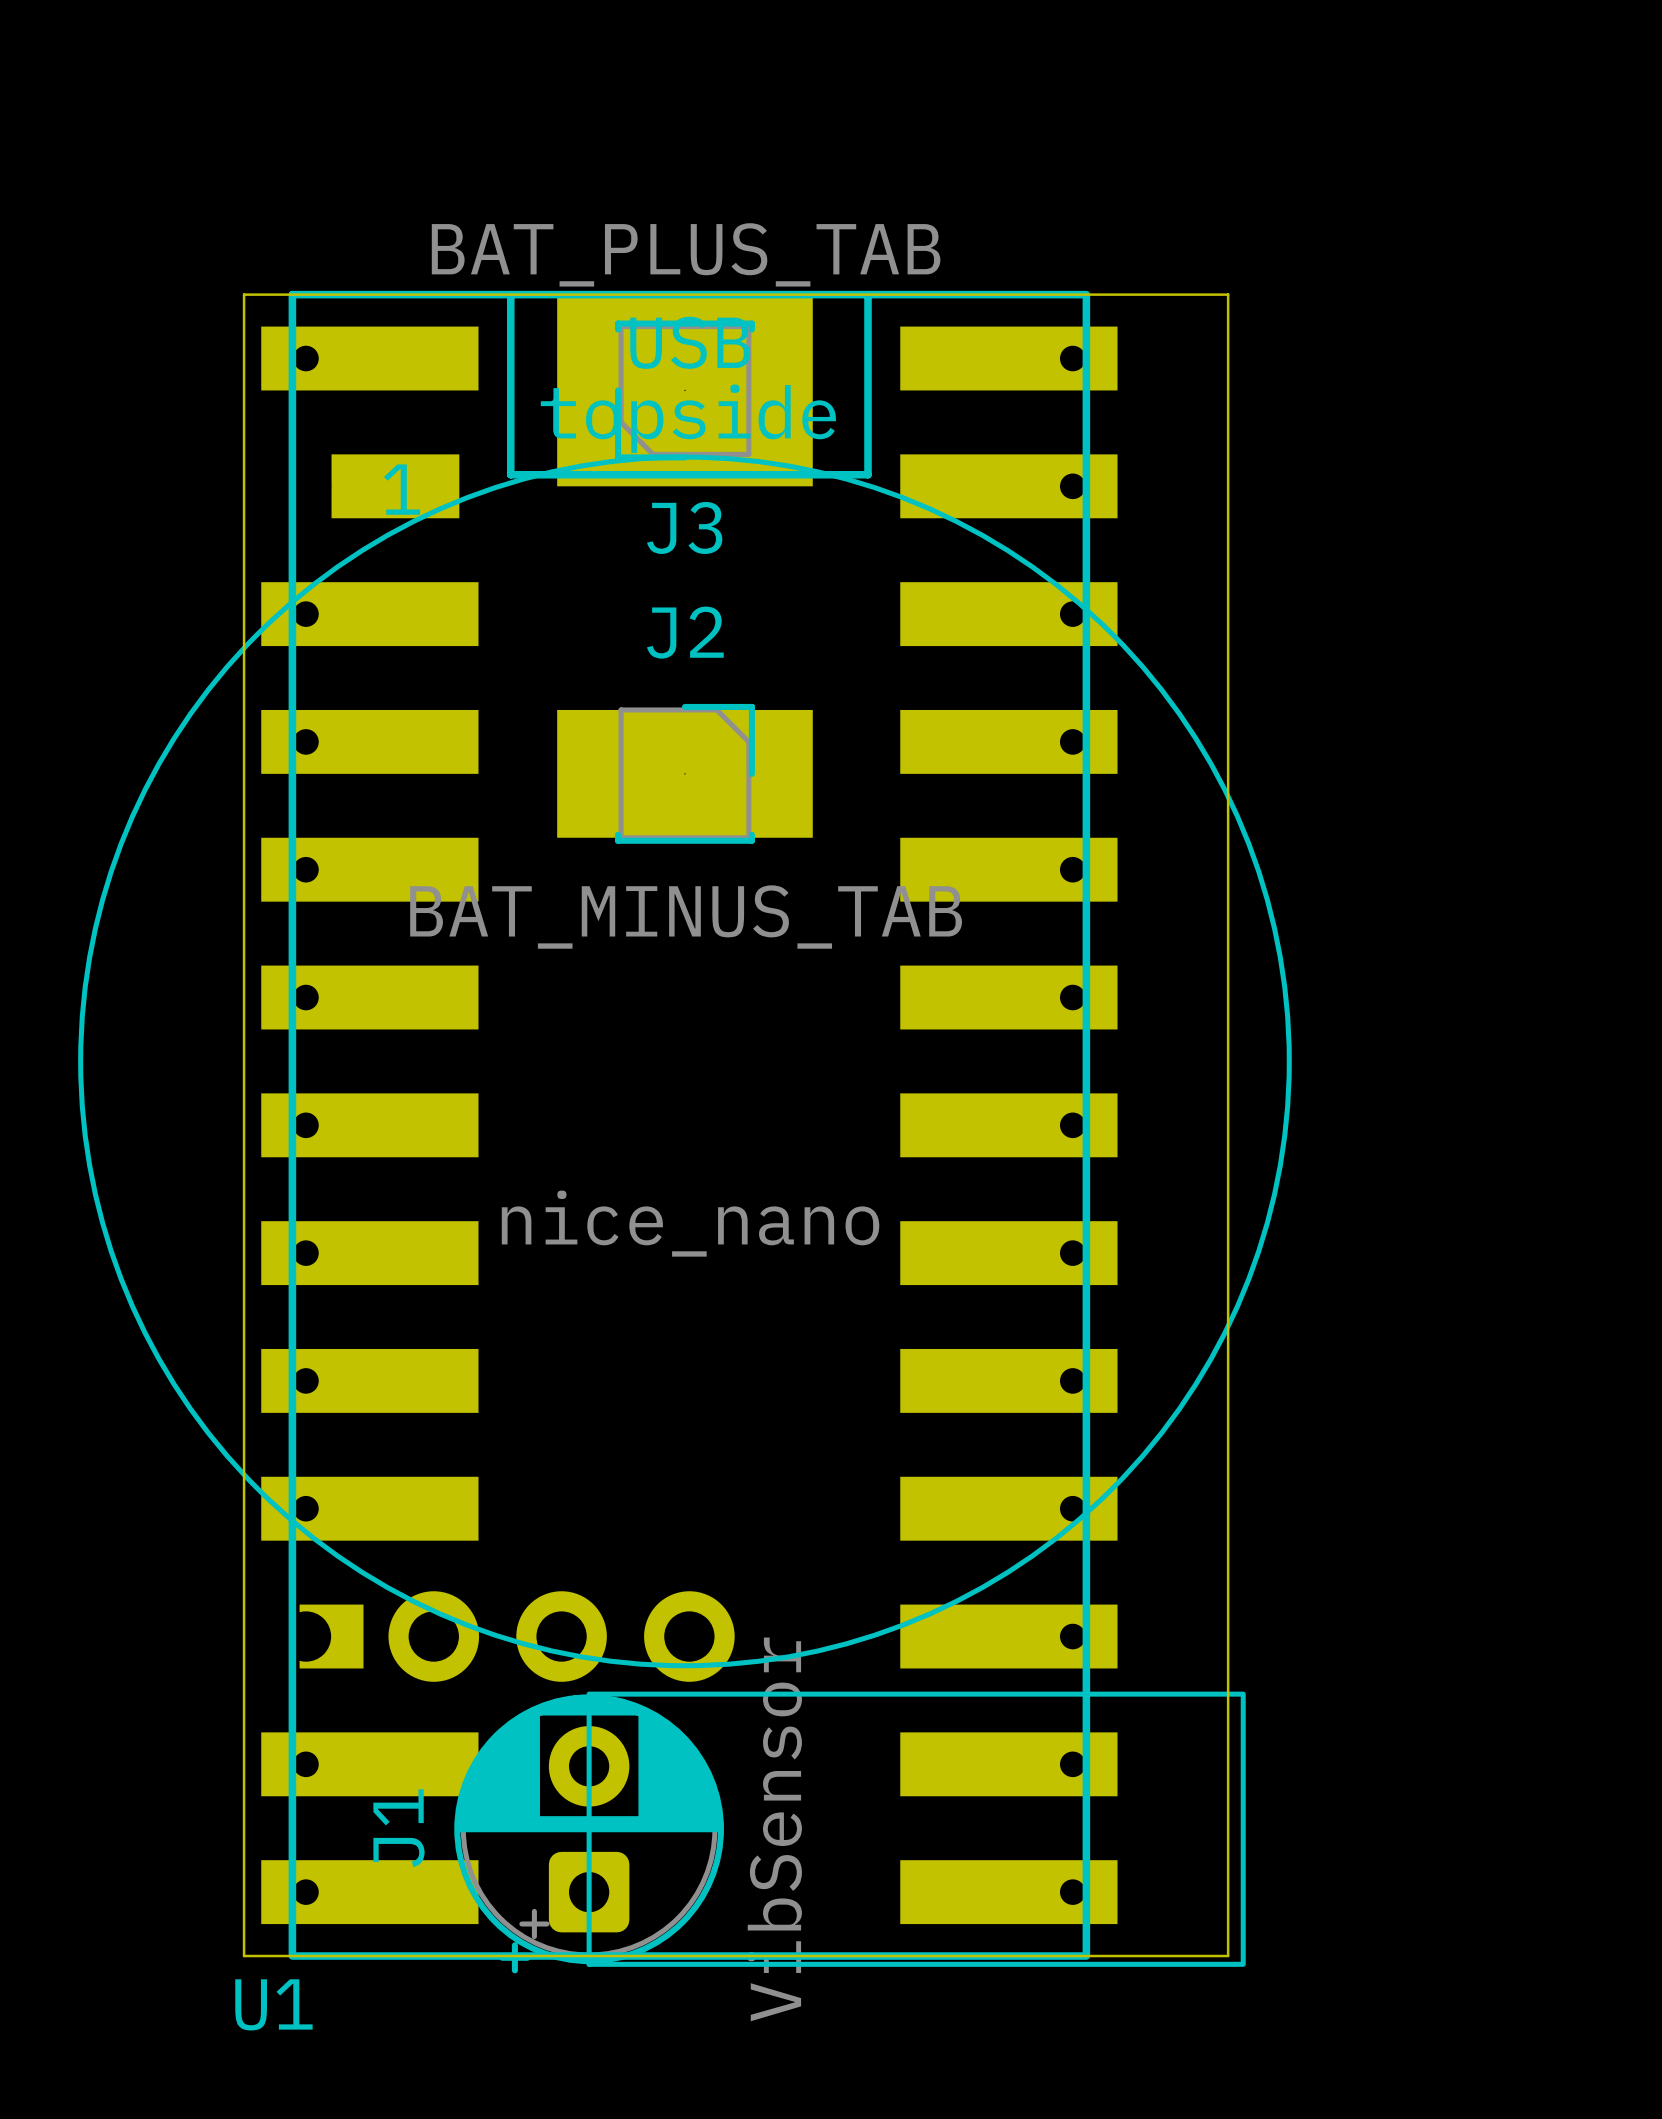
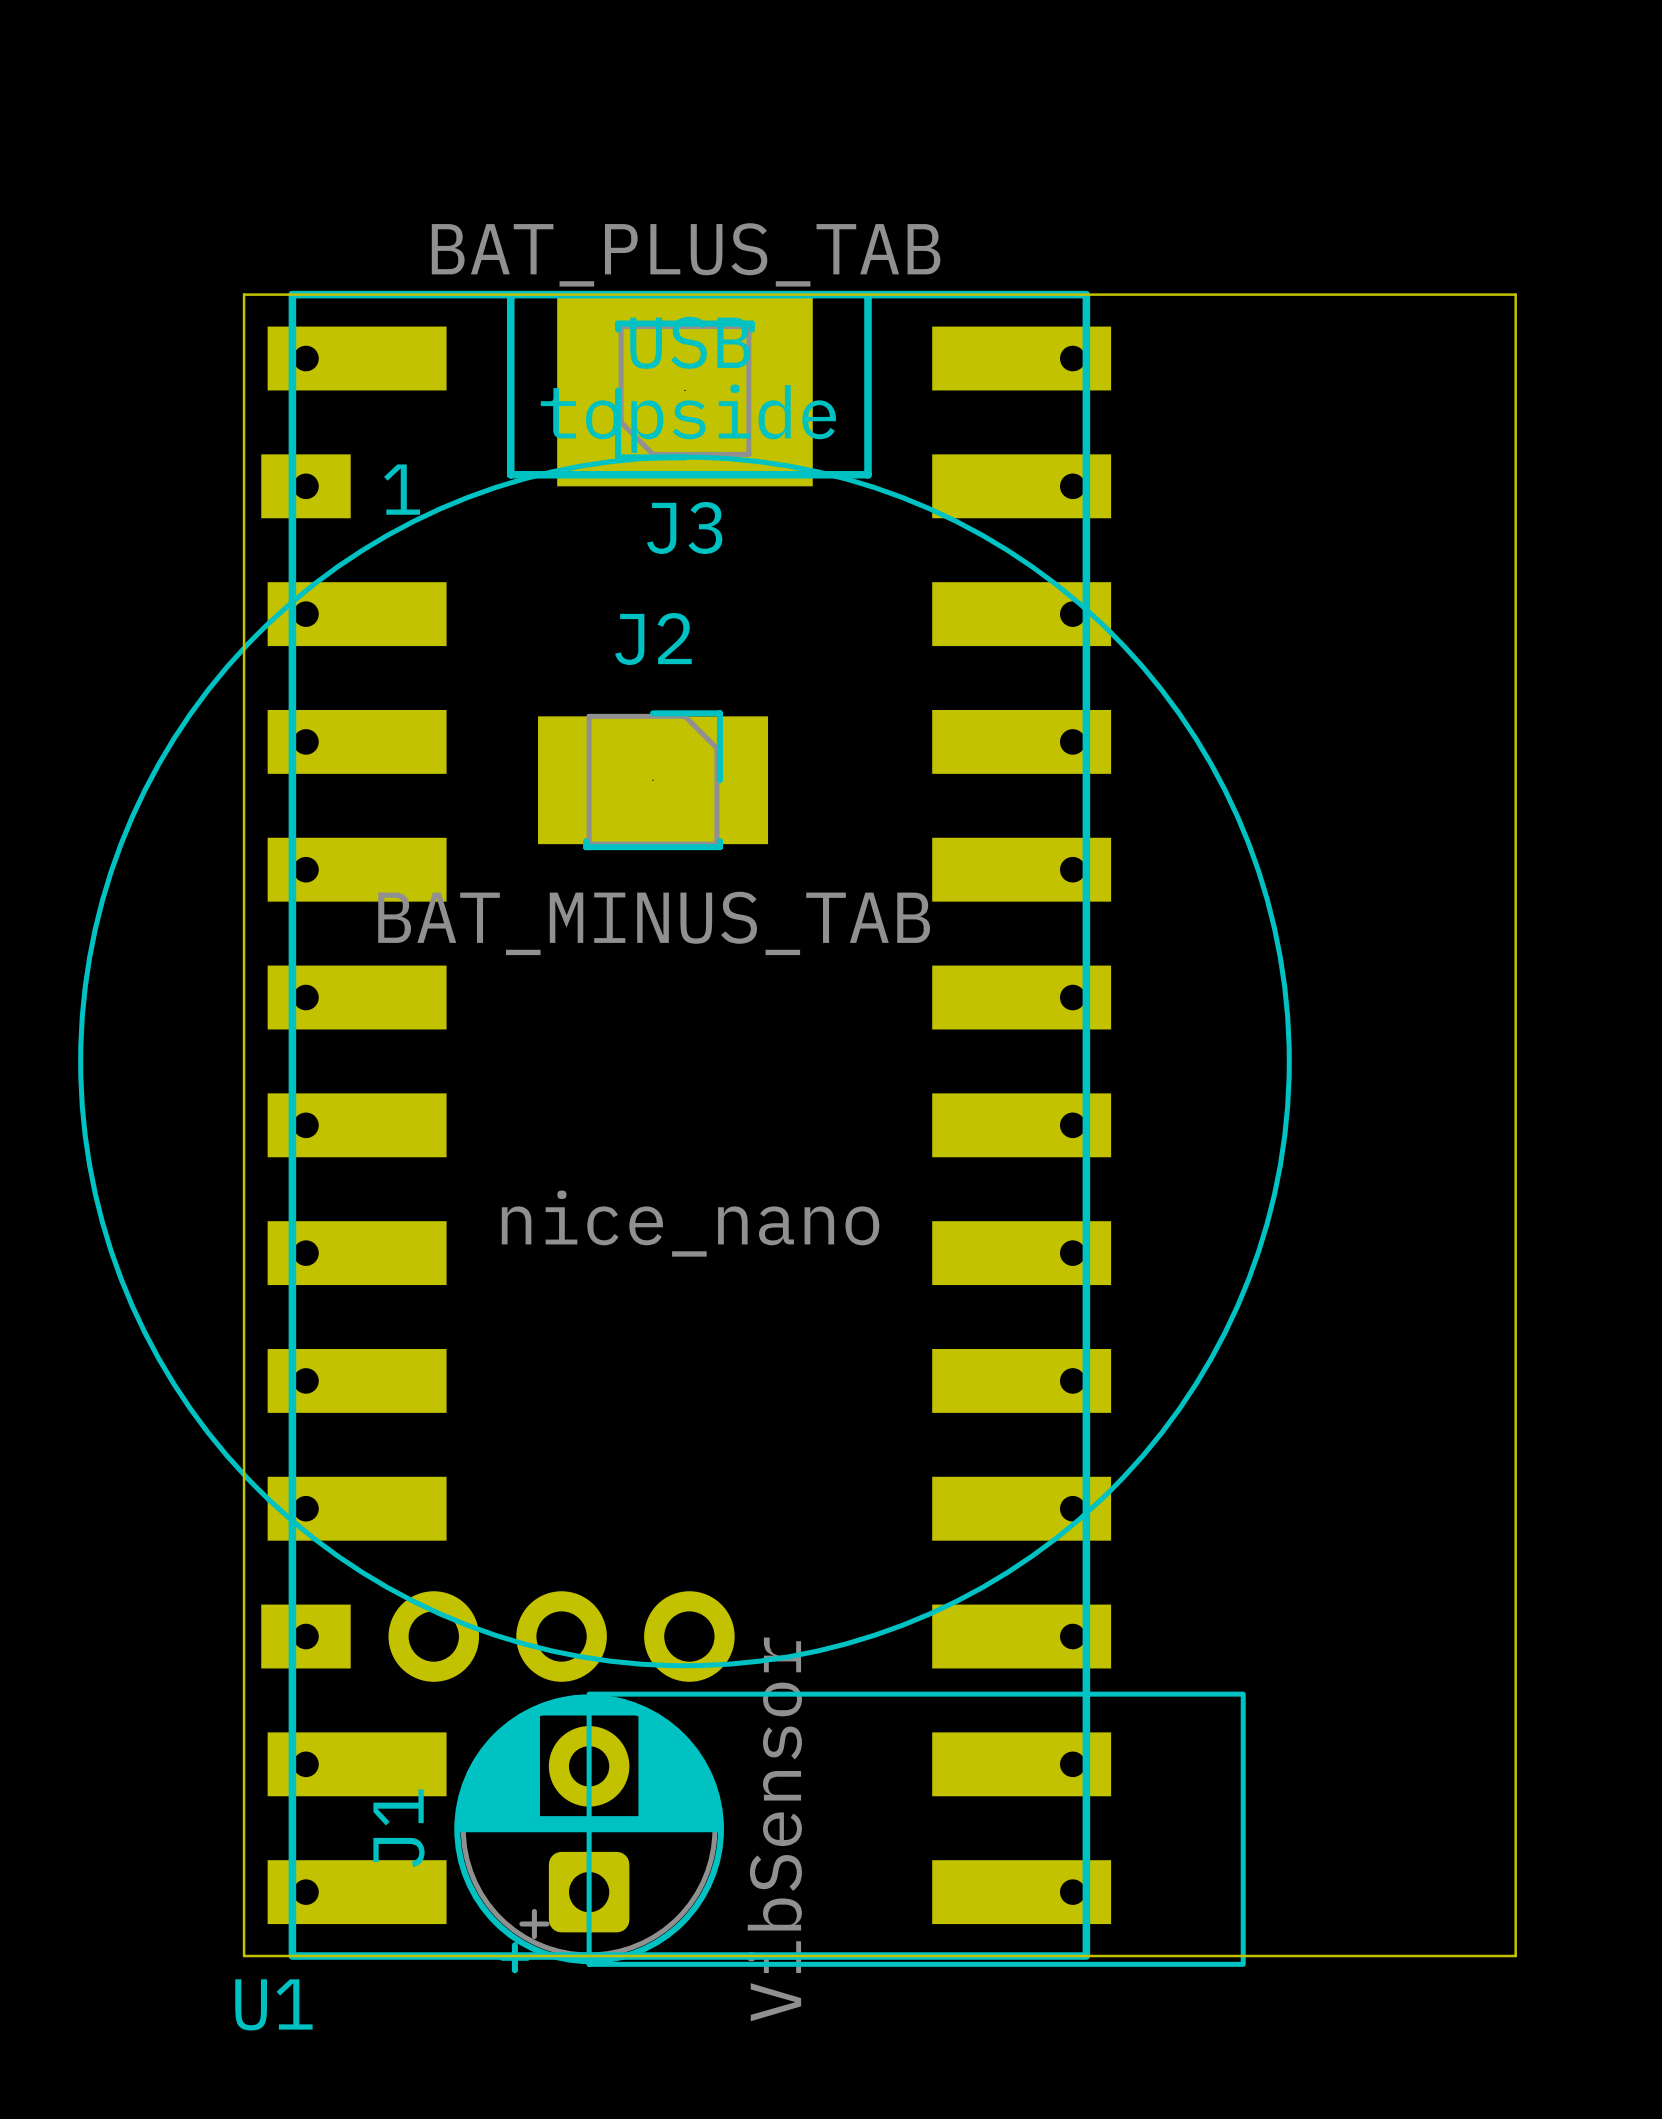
U1 footprint: [261, 290, 1118, 1960] -> [261, 290, 1112, 1960]
board edge: (1228, 294) (1228, 1956) -> (1228, 294) (1515, 294) (1515, 1956) (1228, 1956)
J2 name position: J2 (685, 632) -> J2 (653, 639)
J2 footprint: [557, 703, 813, 844] -> [538, 710, 769, 851]
J2 value position: BAT_MINUS_TAB (686, 917) -> BAT_MINUS_TAB (654, 923)

